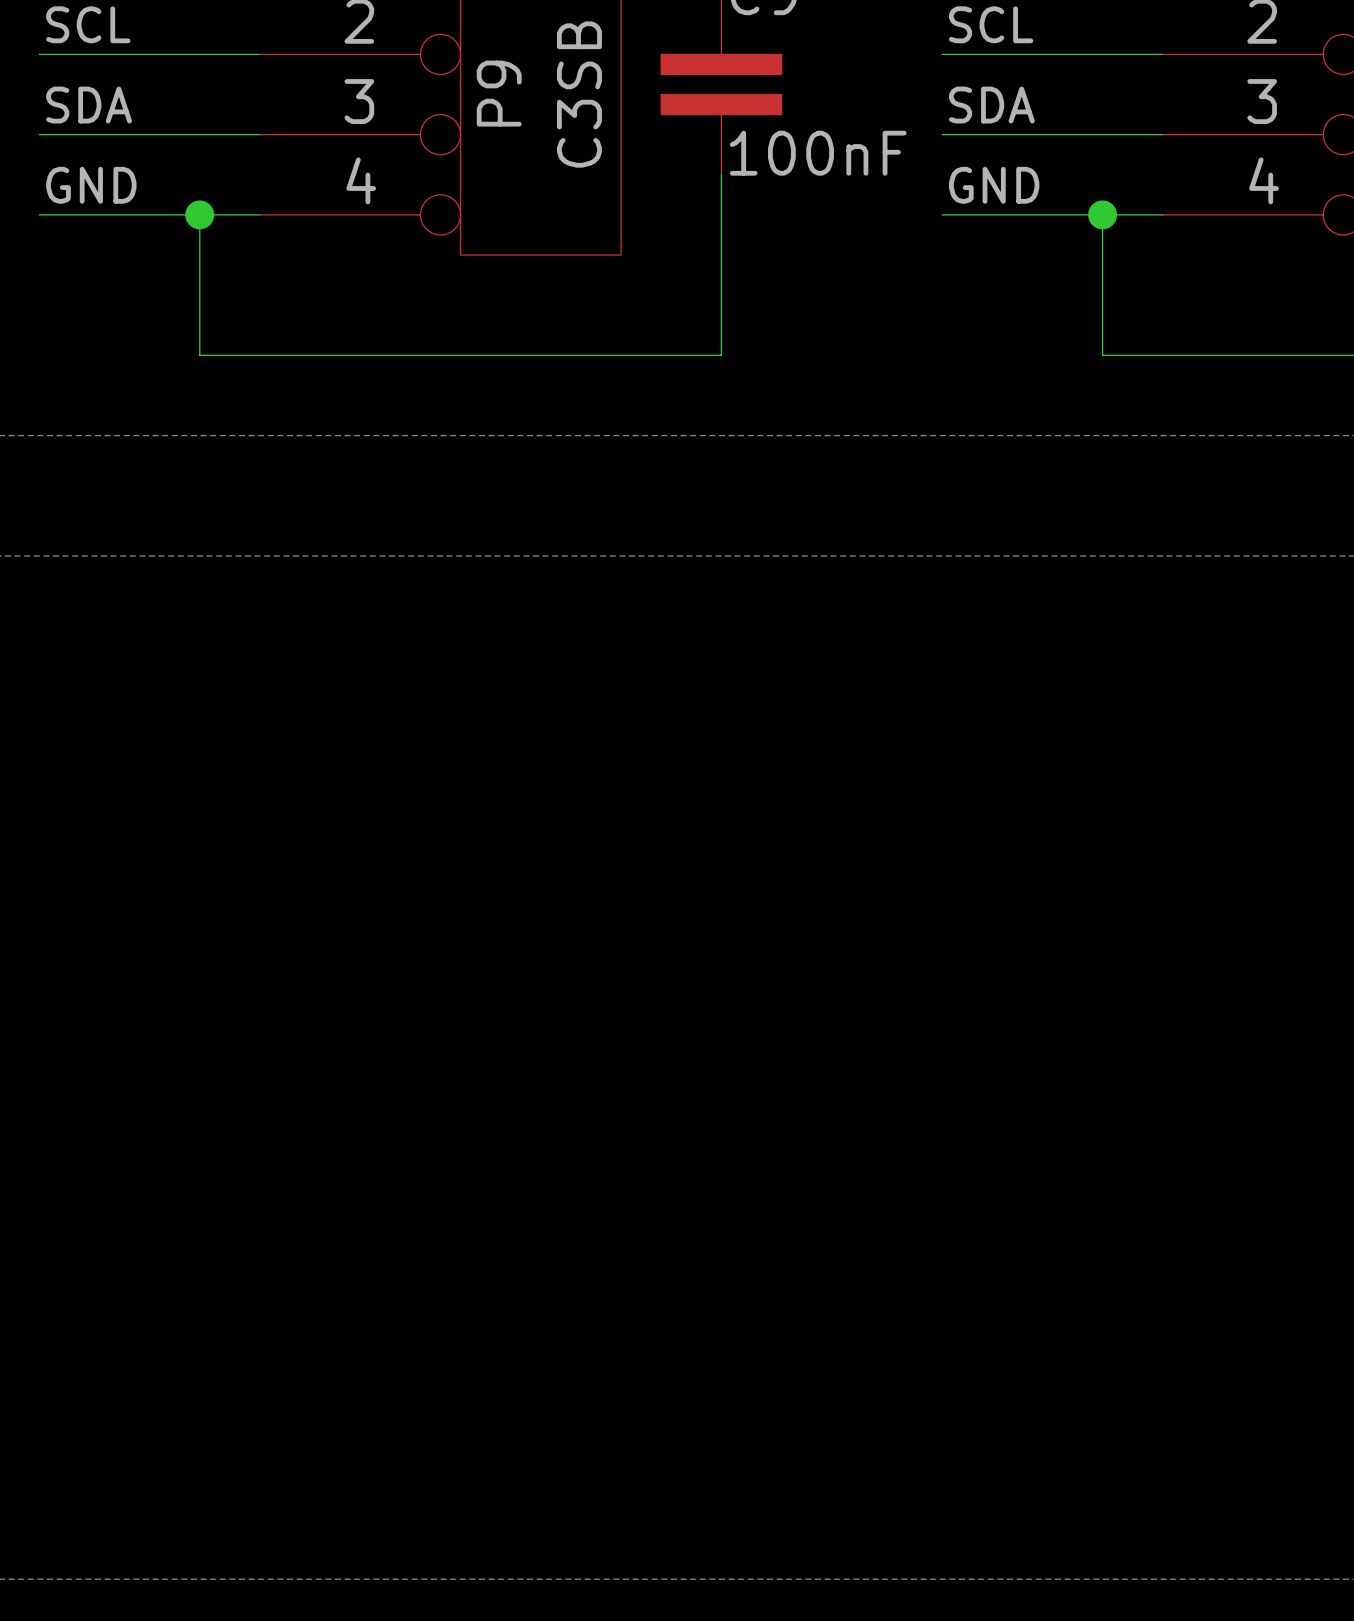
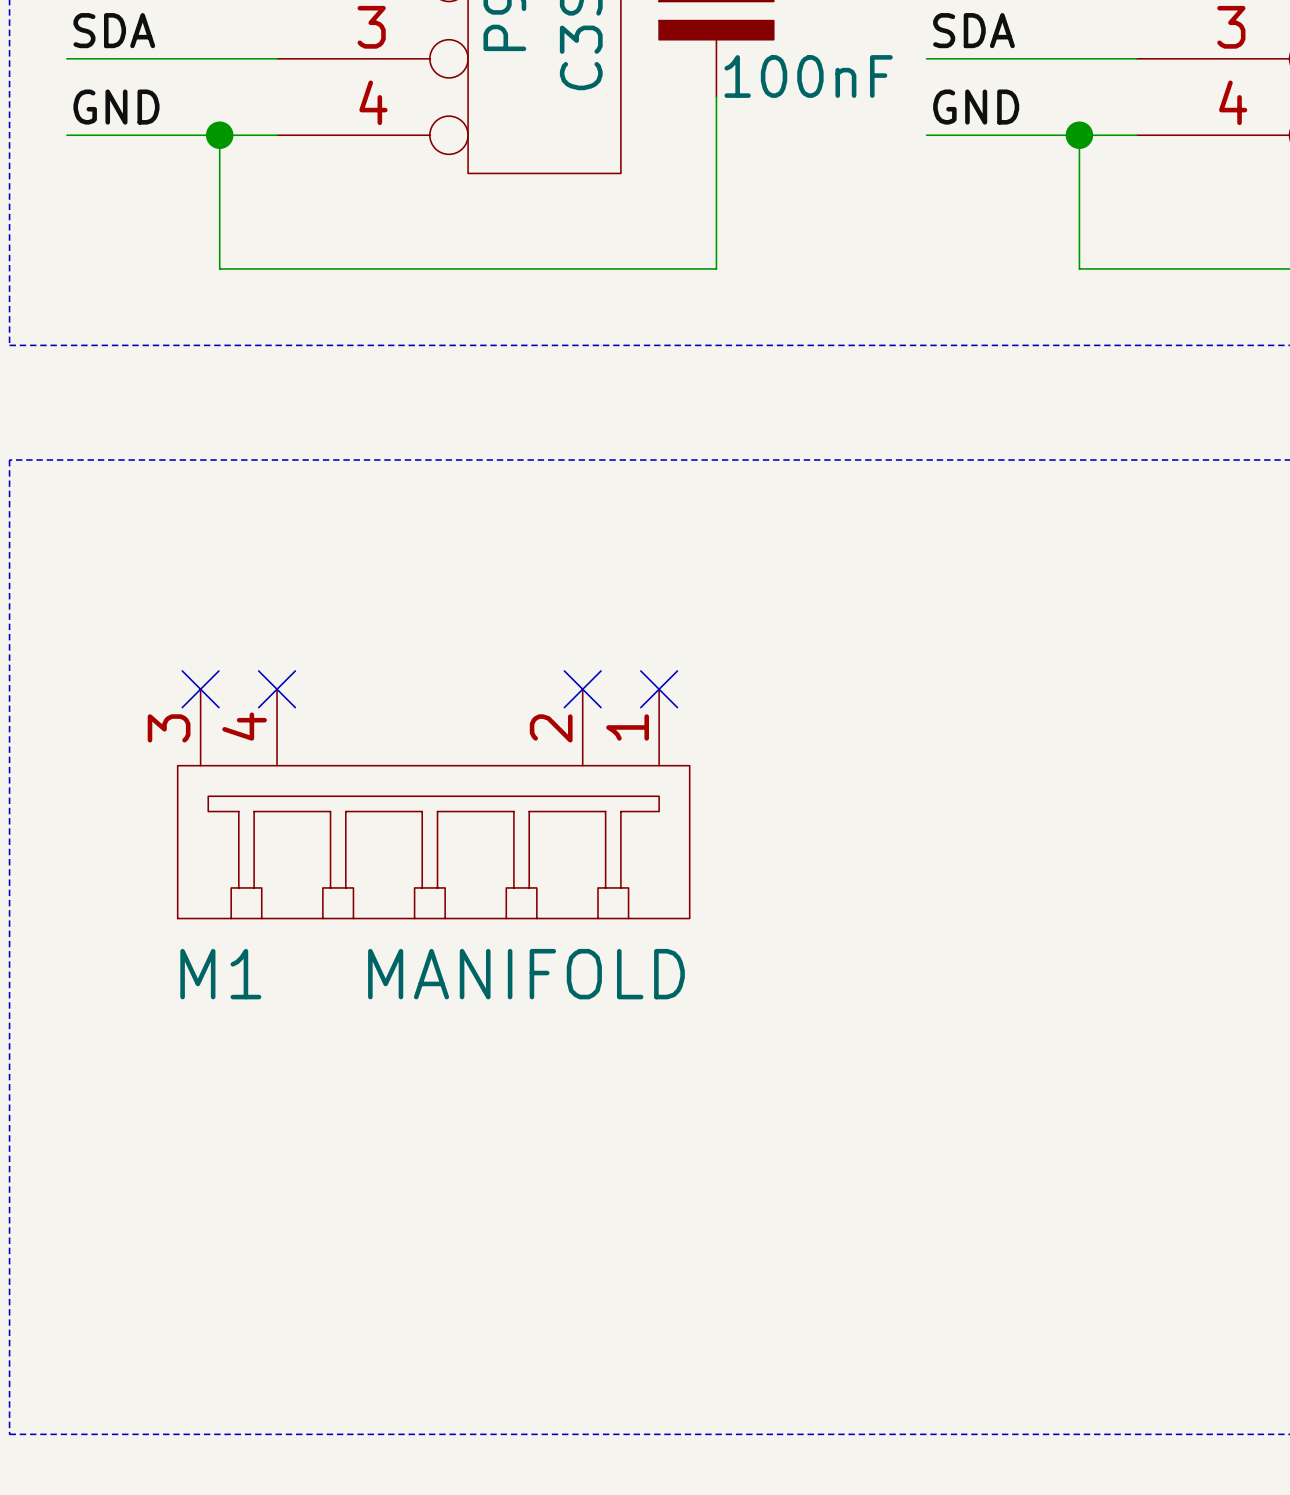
no-connect mark: none -> (200, 689)
no-connect mark: none -> (277, 689)
no-connect mark: none -> (582, 689)
no-connect mark: none -> (659, 689)
M1: none -> MANIFOLD (433, 803)

